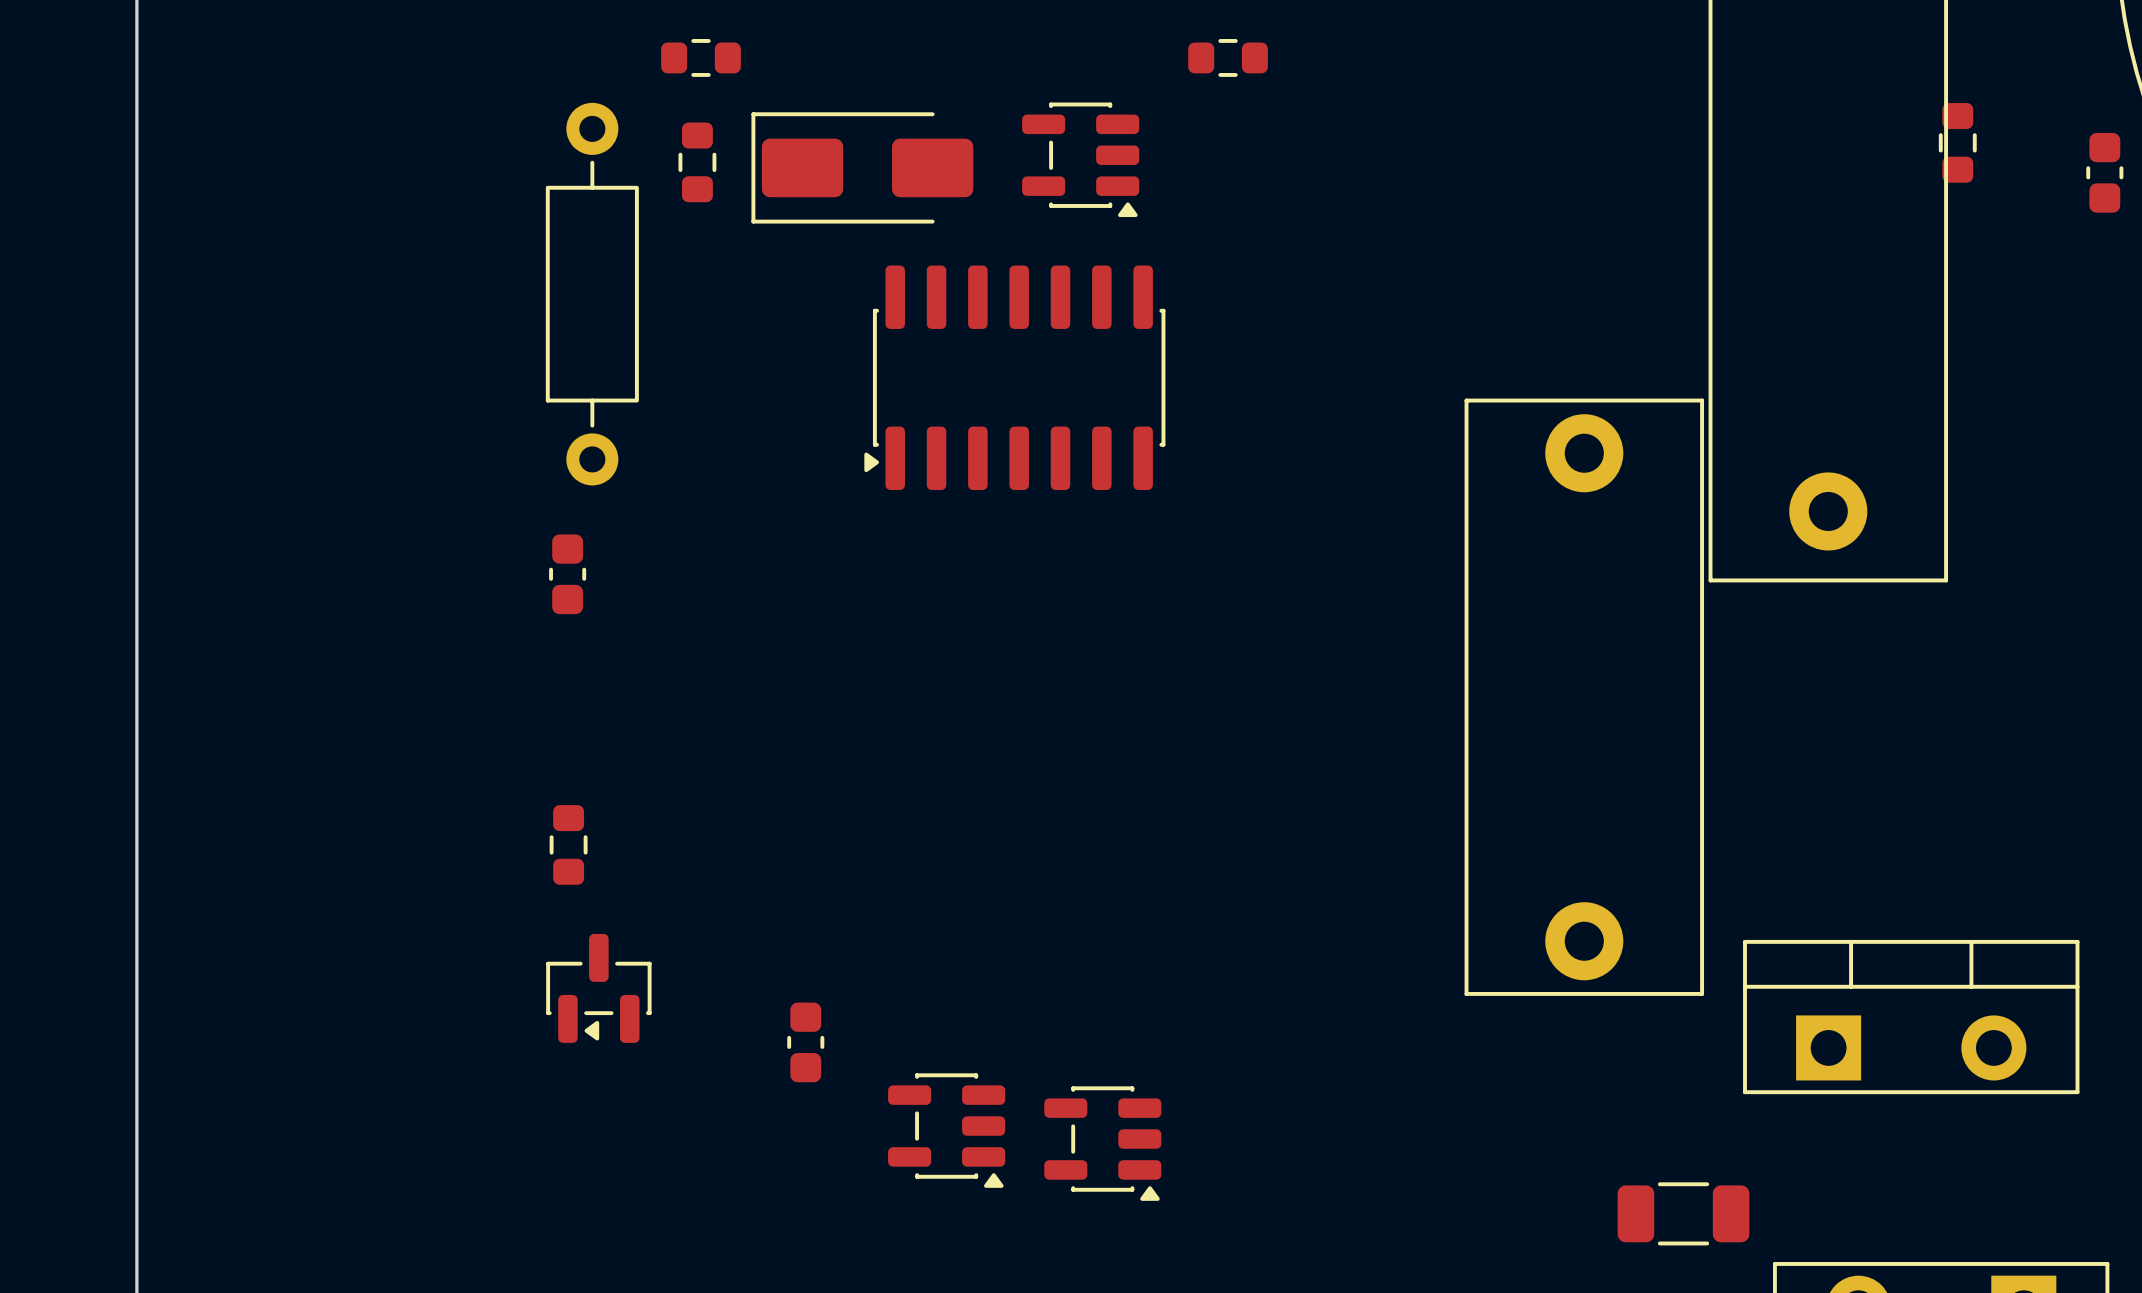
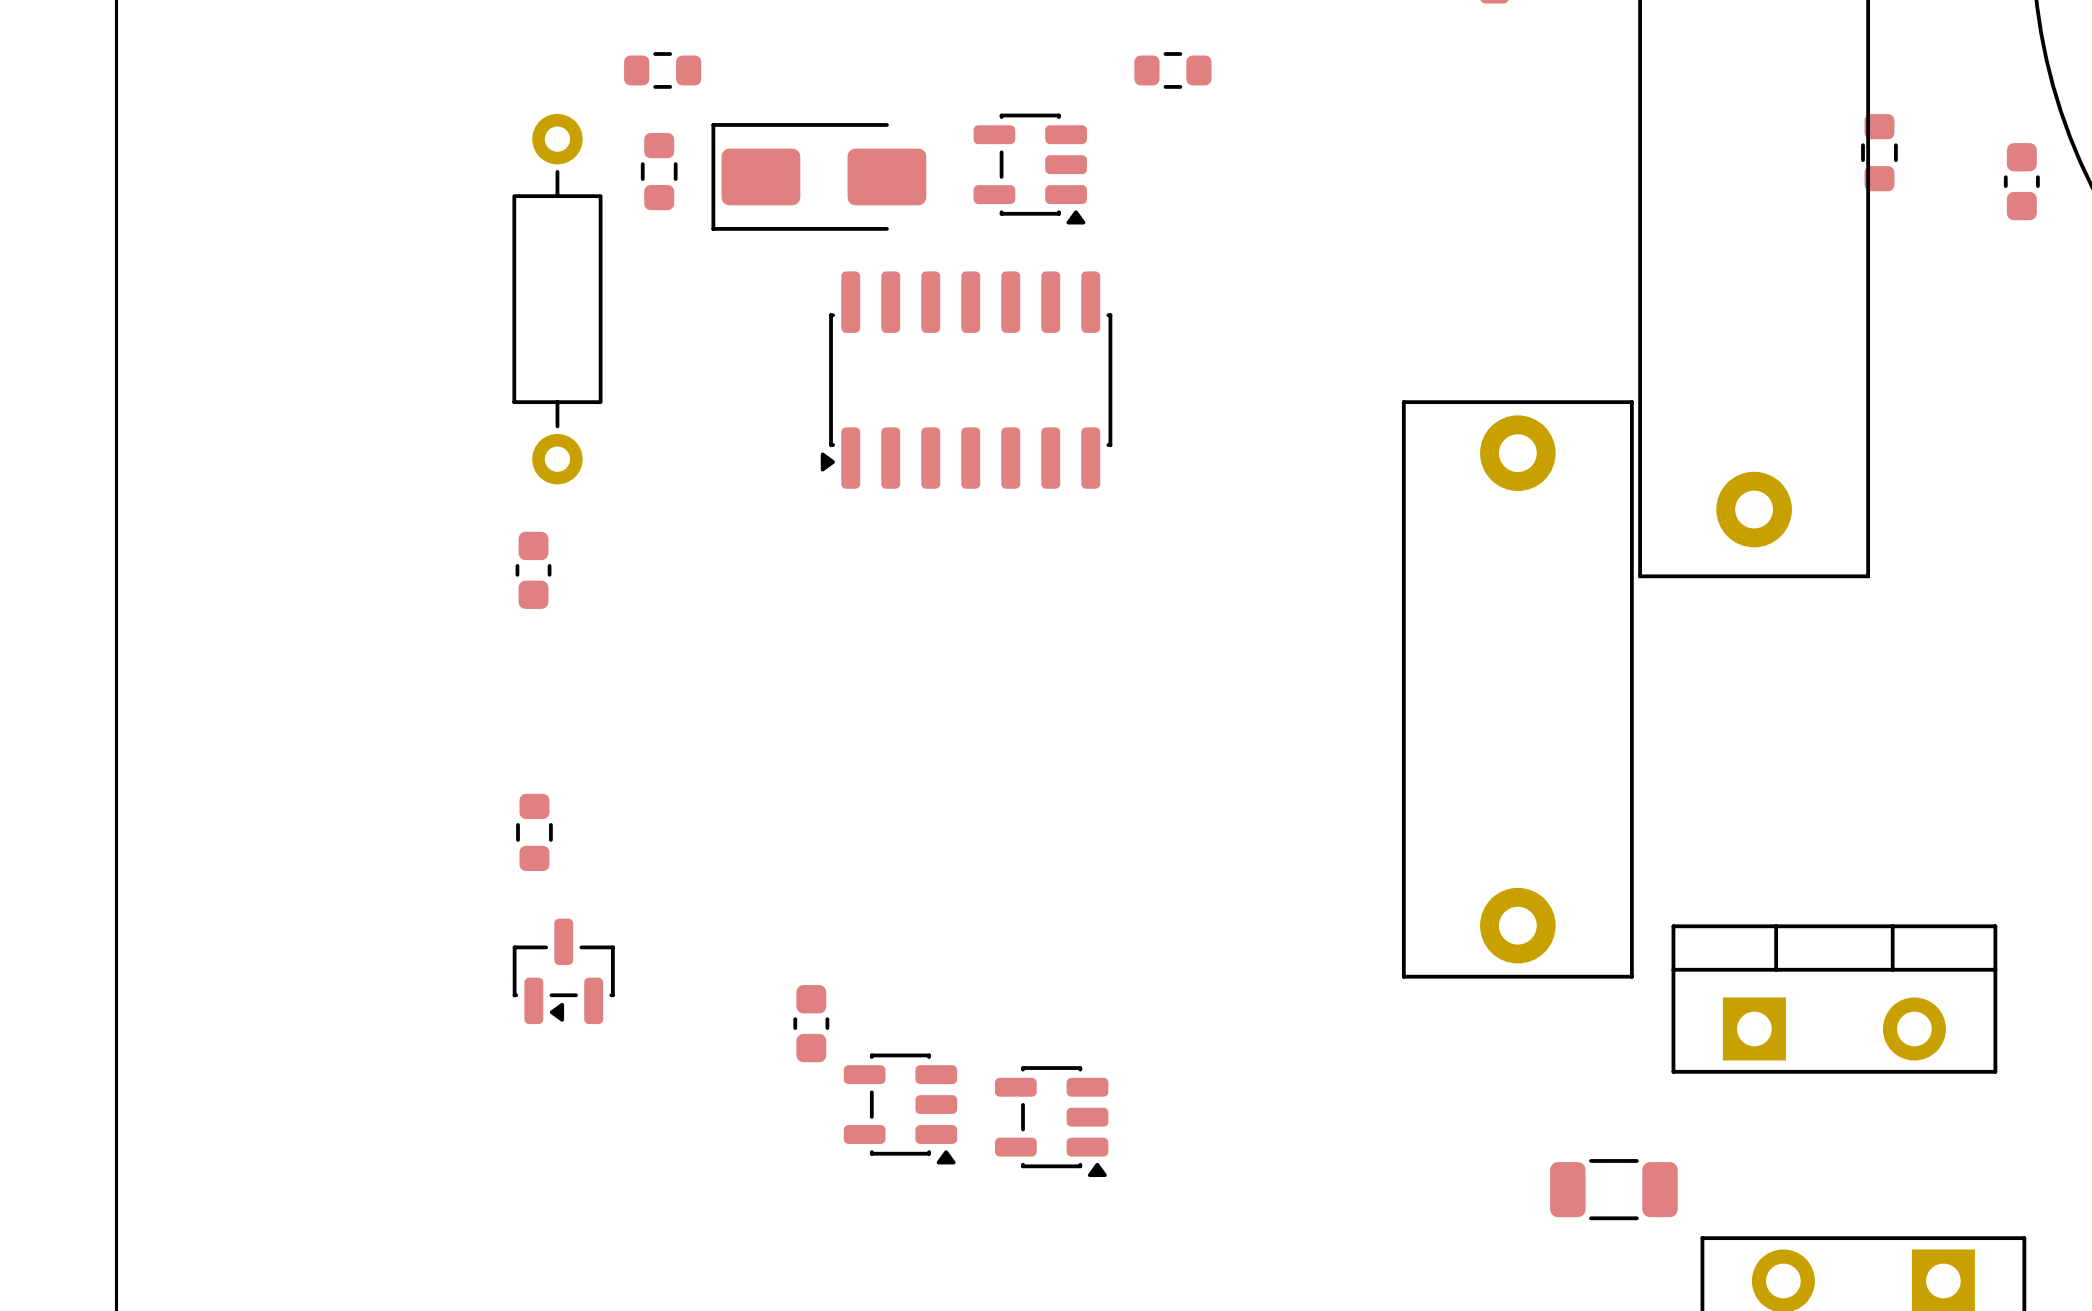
part position: (805, 1042) -> (811, 1023)

